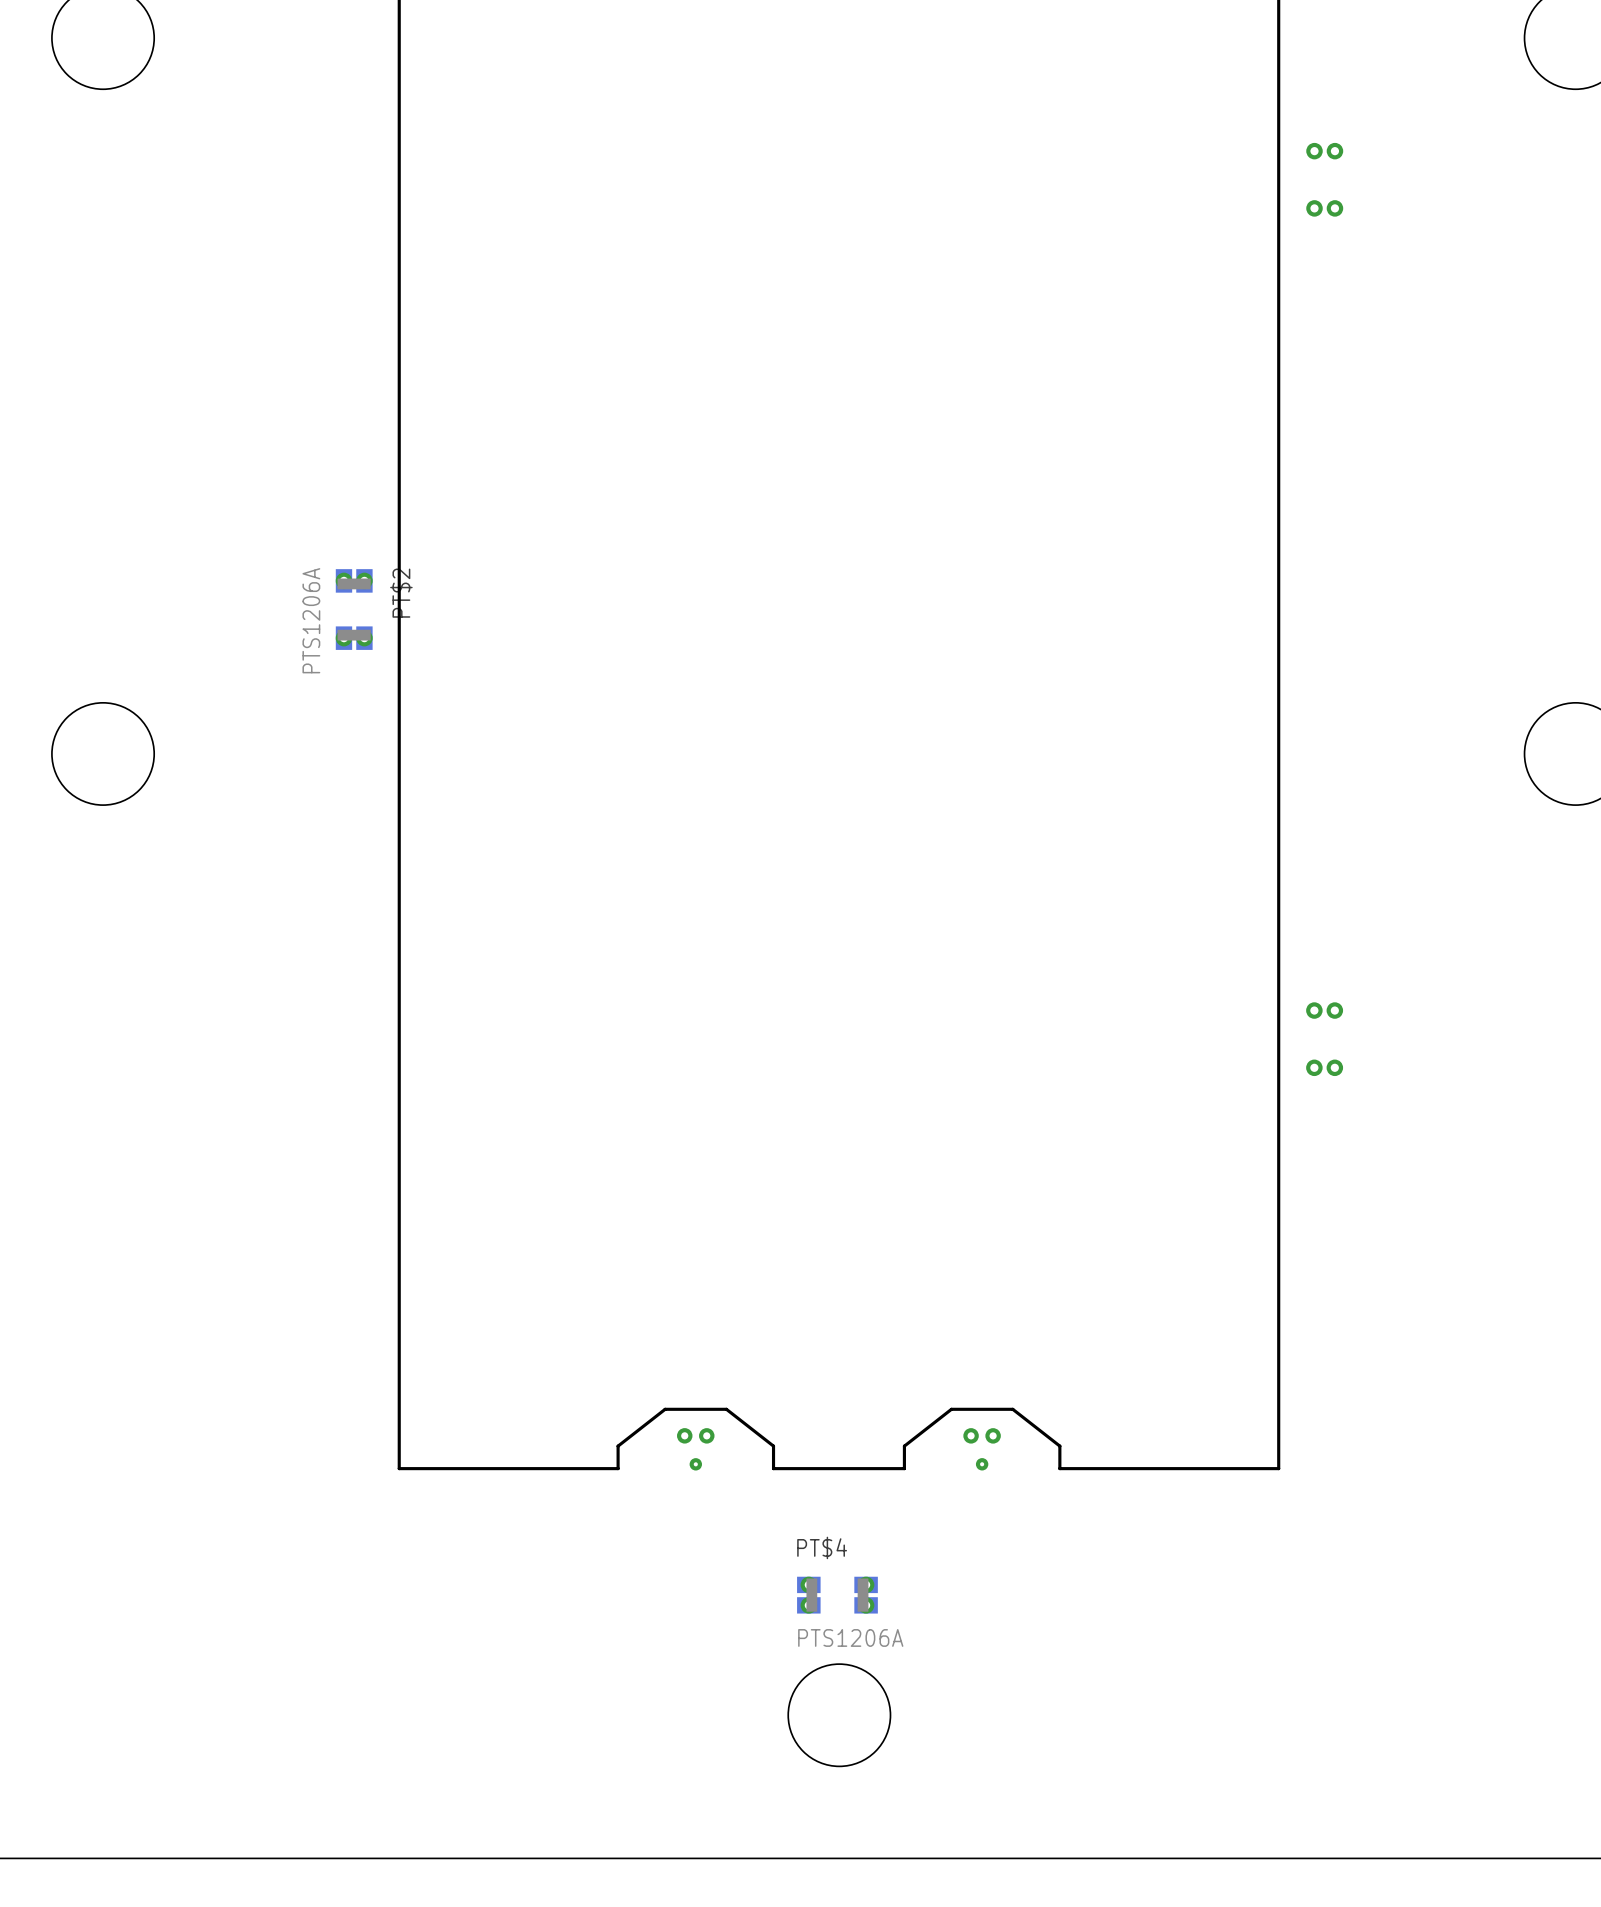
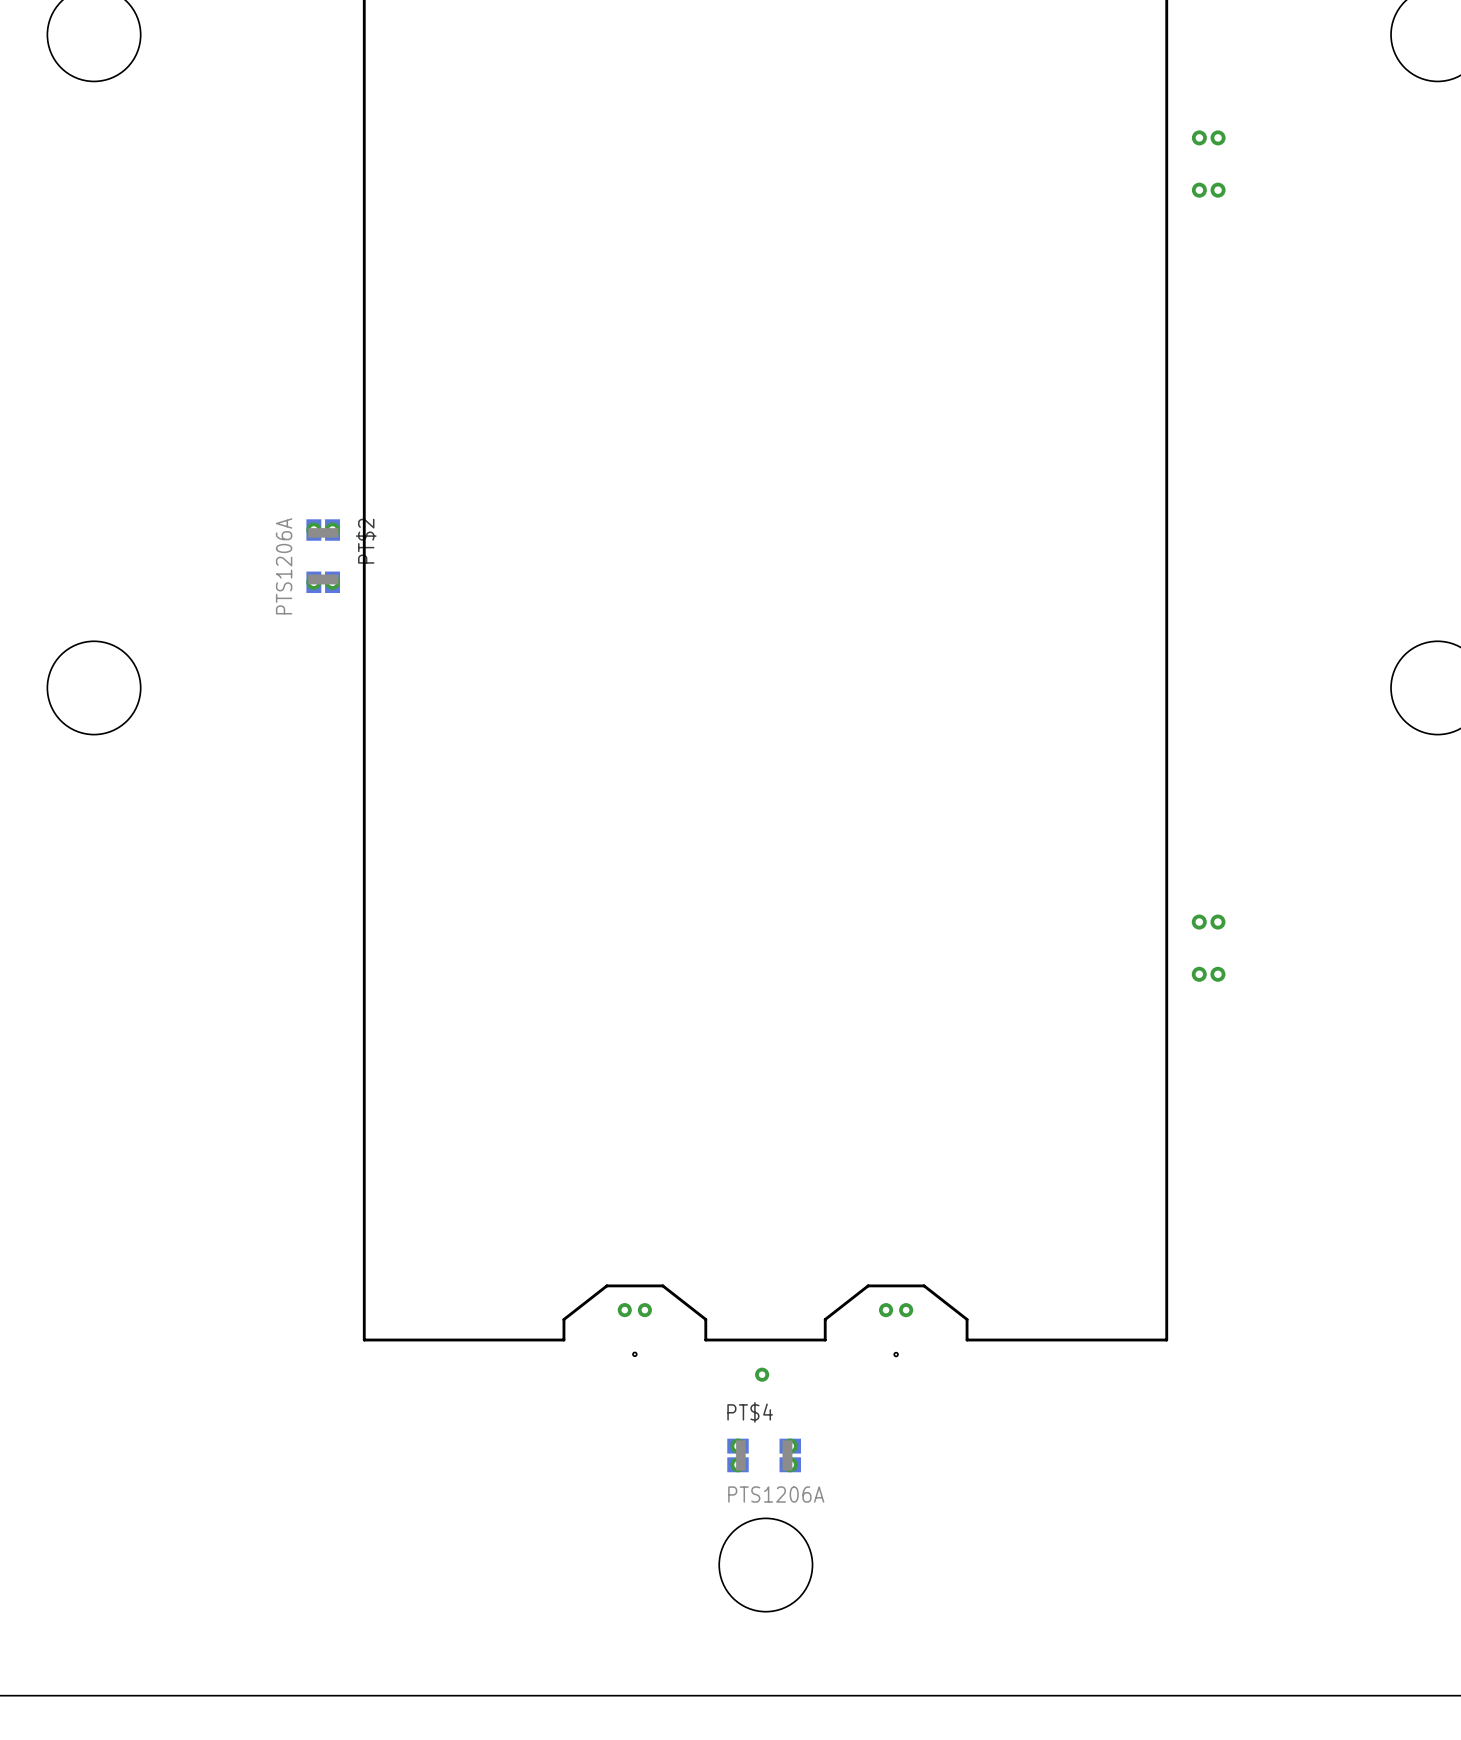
via: (695, 1464) -> none
via: (982, 1464) -> none
hole: none -> (634, 1354)
hole: none -> (896, 1354)
via: none -> (762, 1374)

